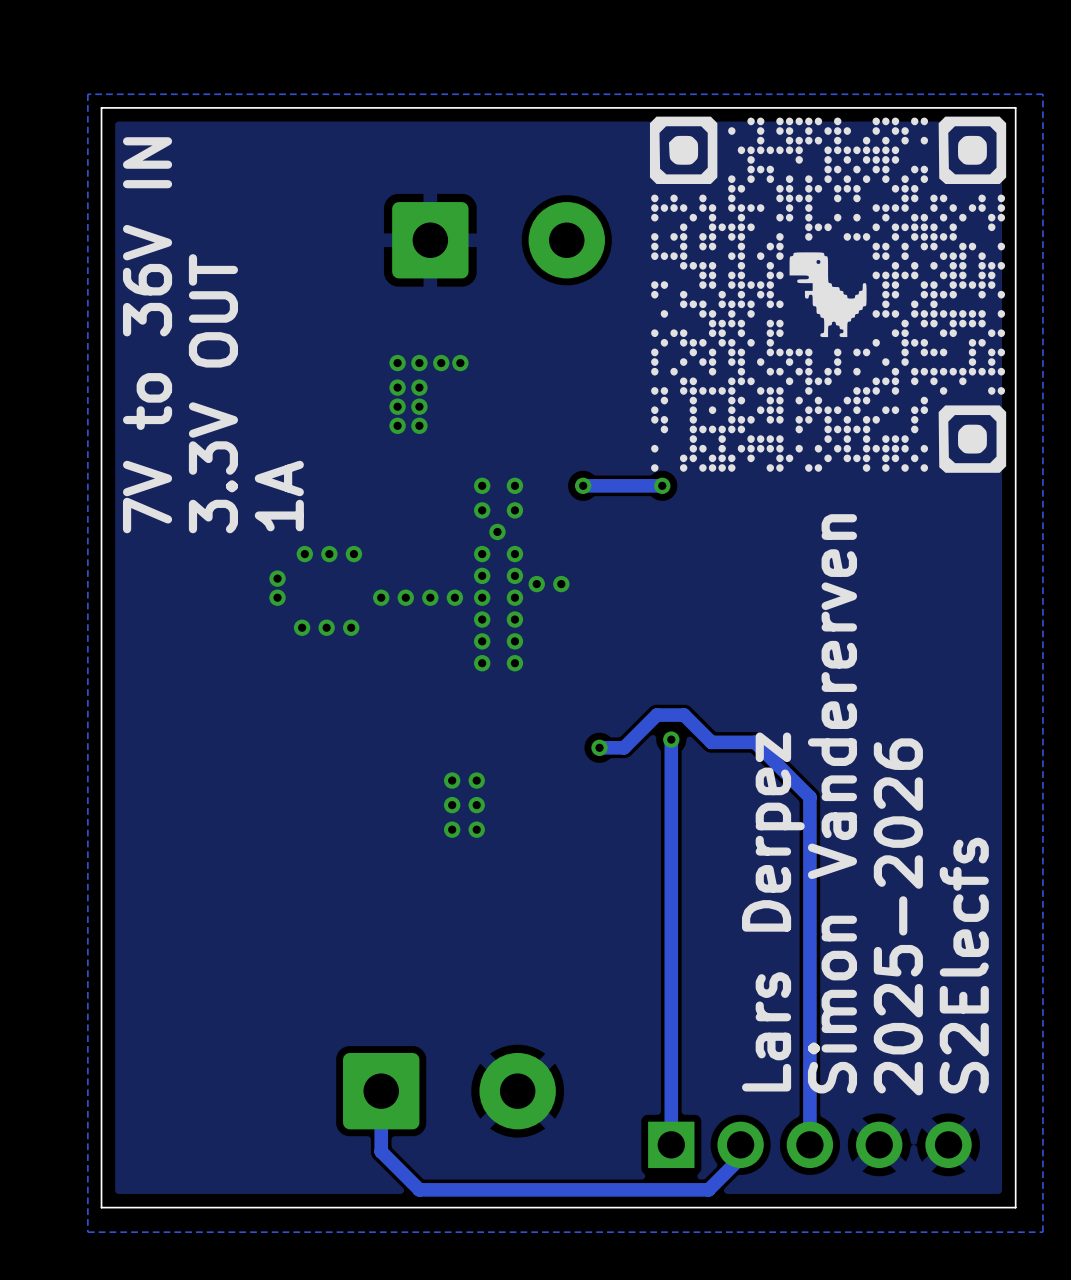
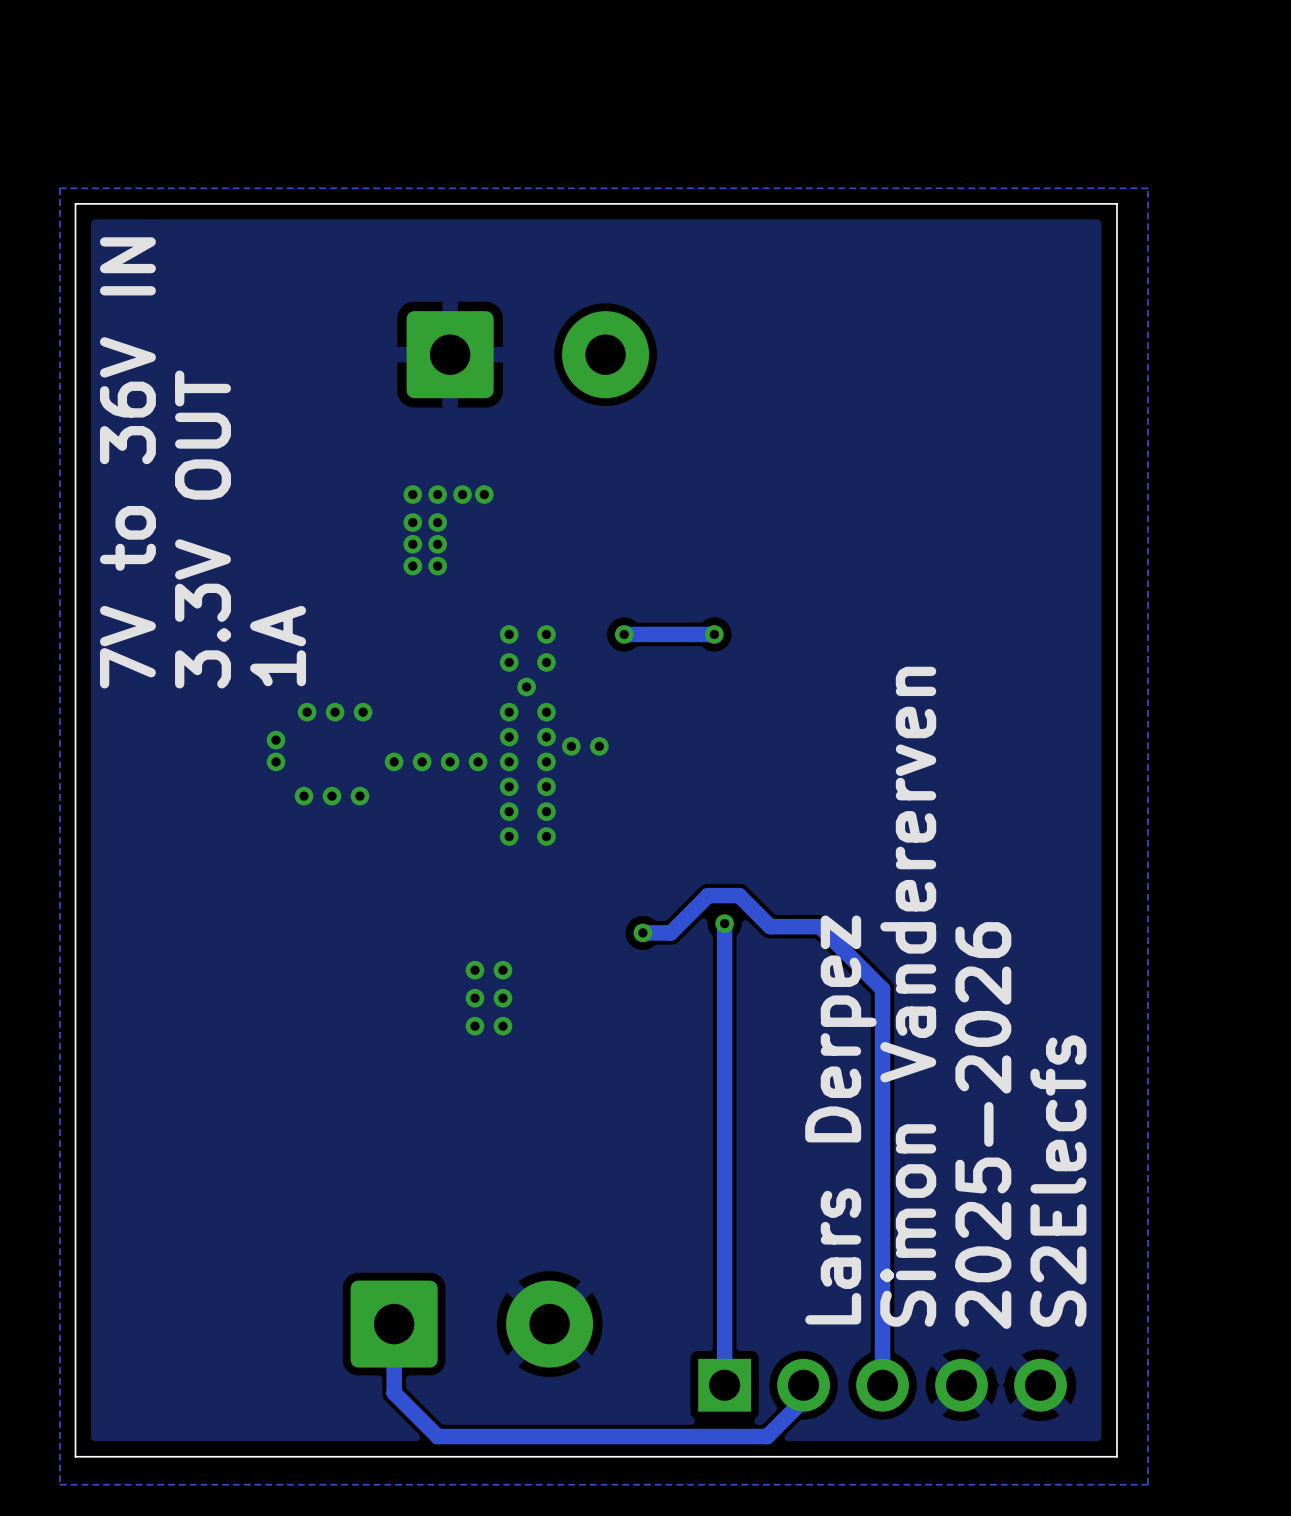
drawing: [649, 116, 1007, 473] -> none

